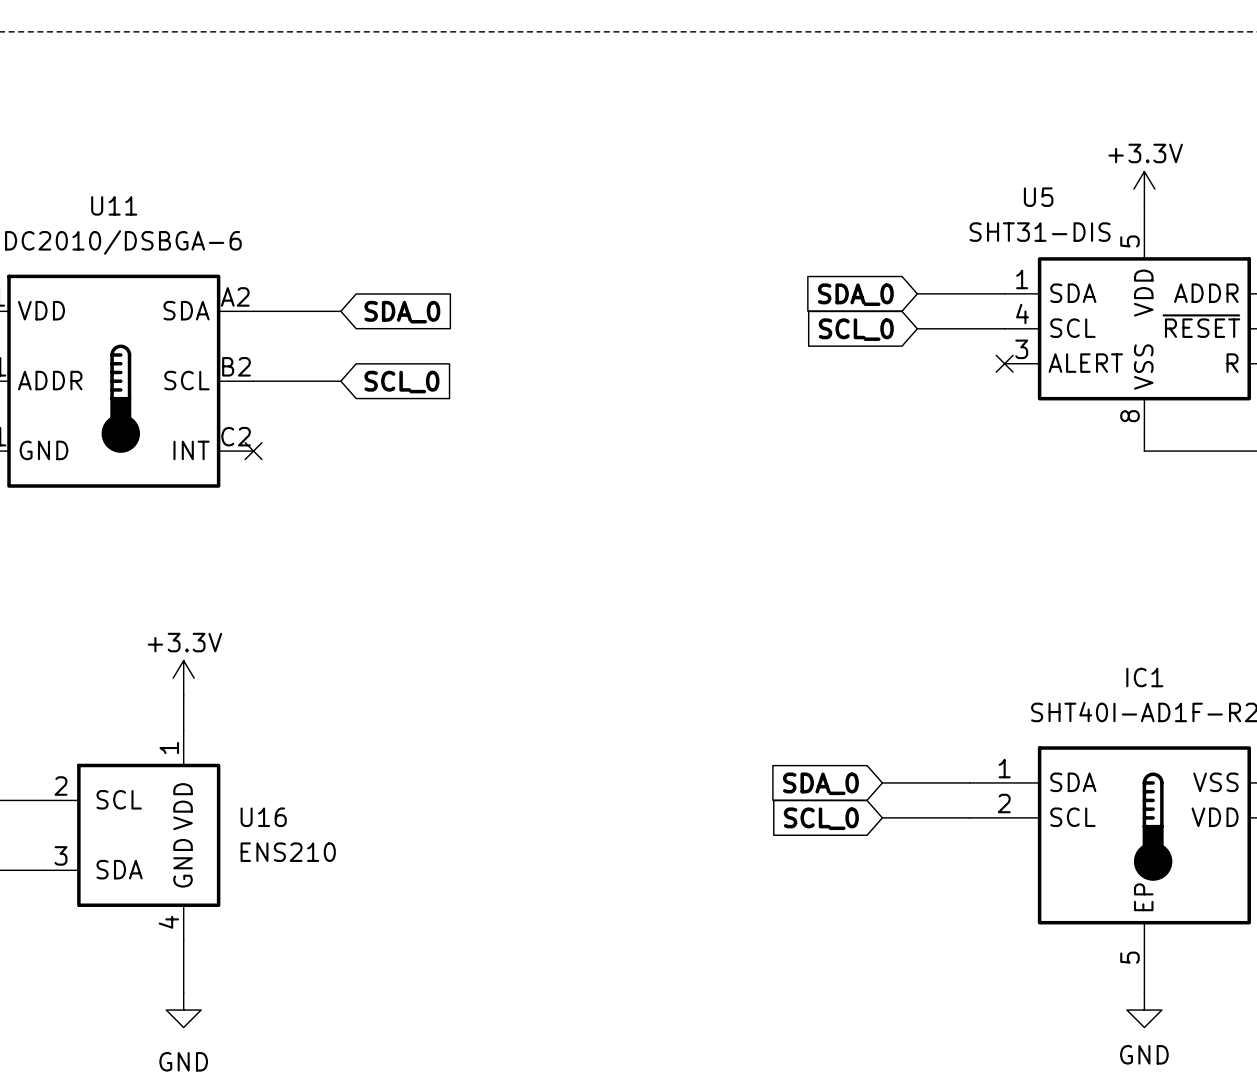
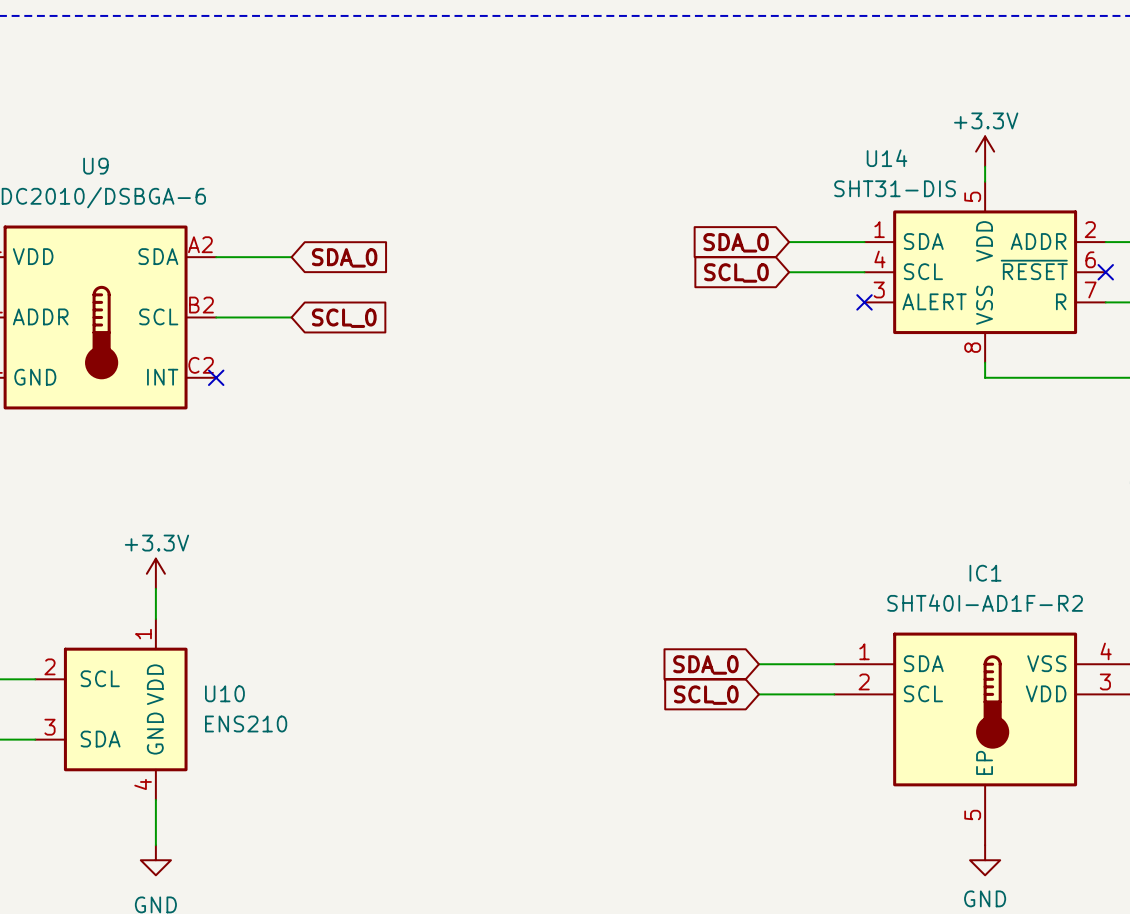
U5 name: U5 (1038, 197) -> U14 (887, 158)
U11 name: U11 (114, 205) -> U9 (95, 166)
U16 name: U16 (263, 817) -> U10 (224, 693)

